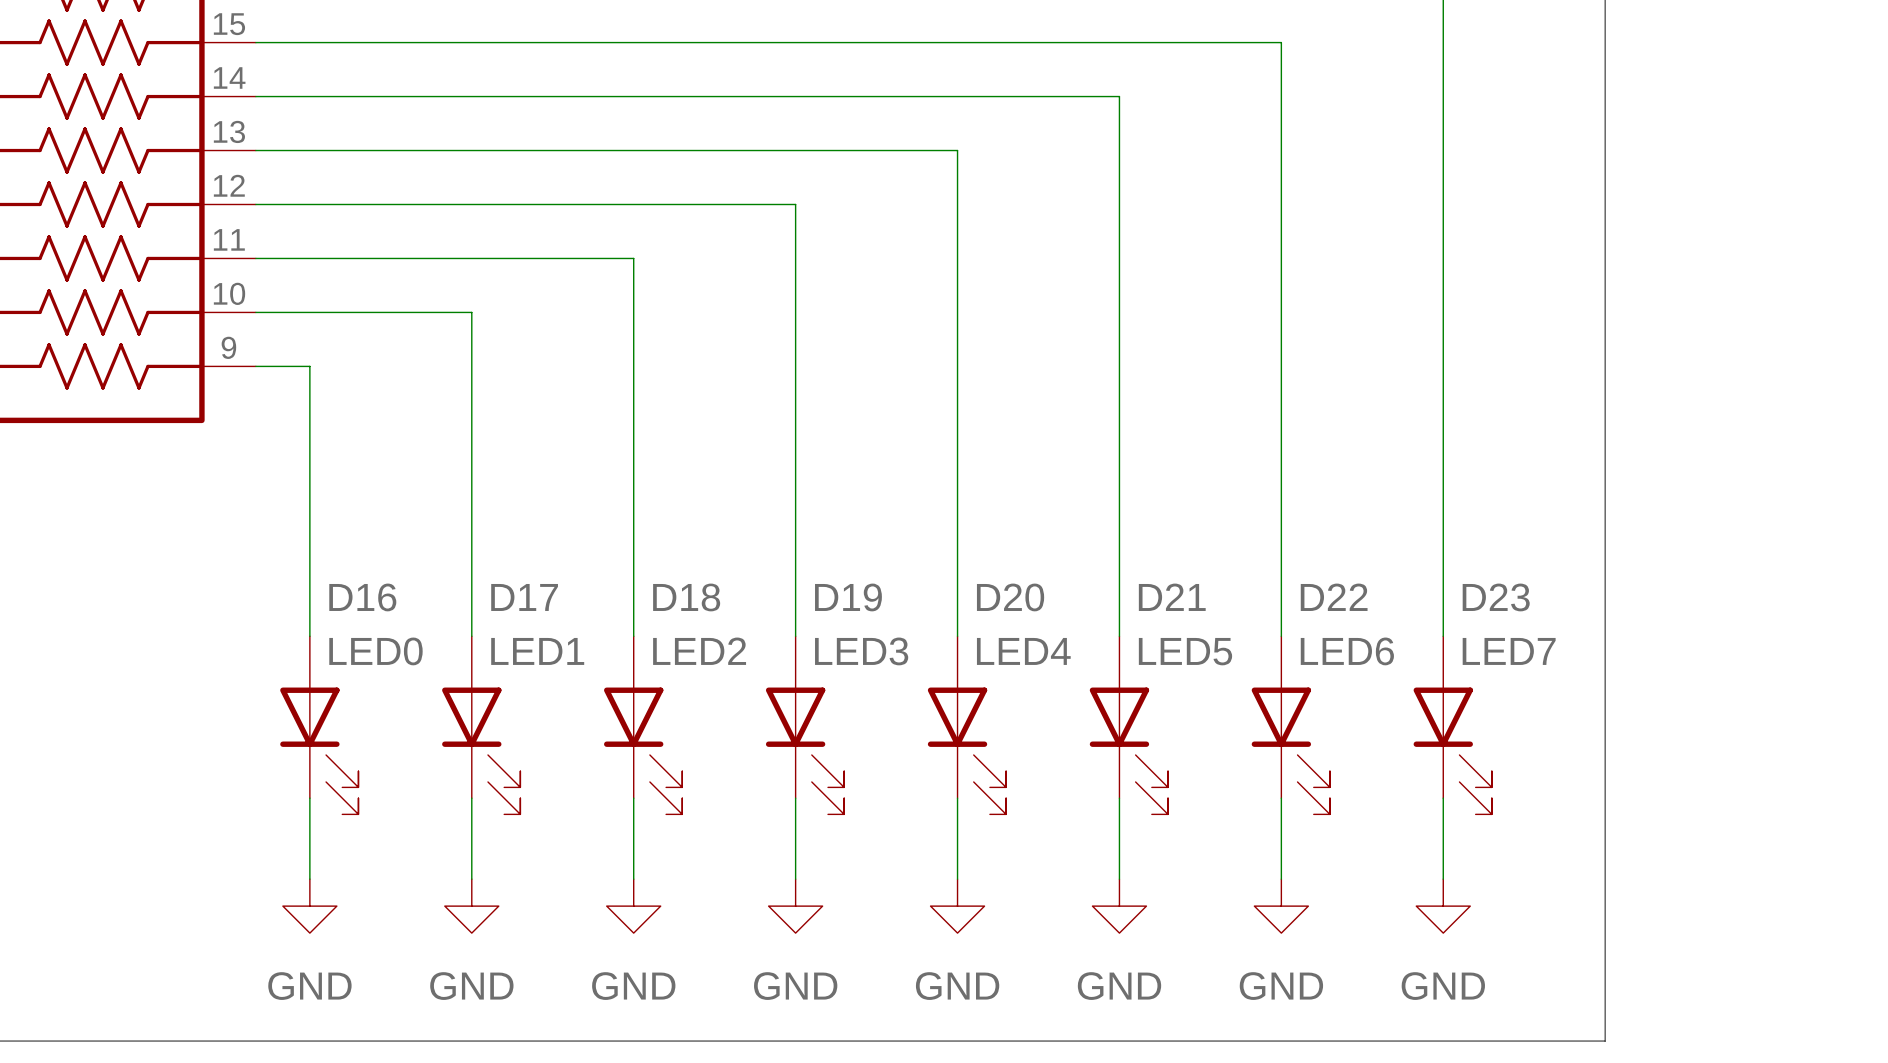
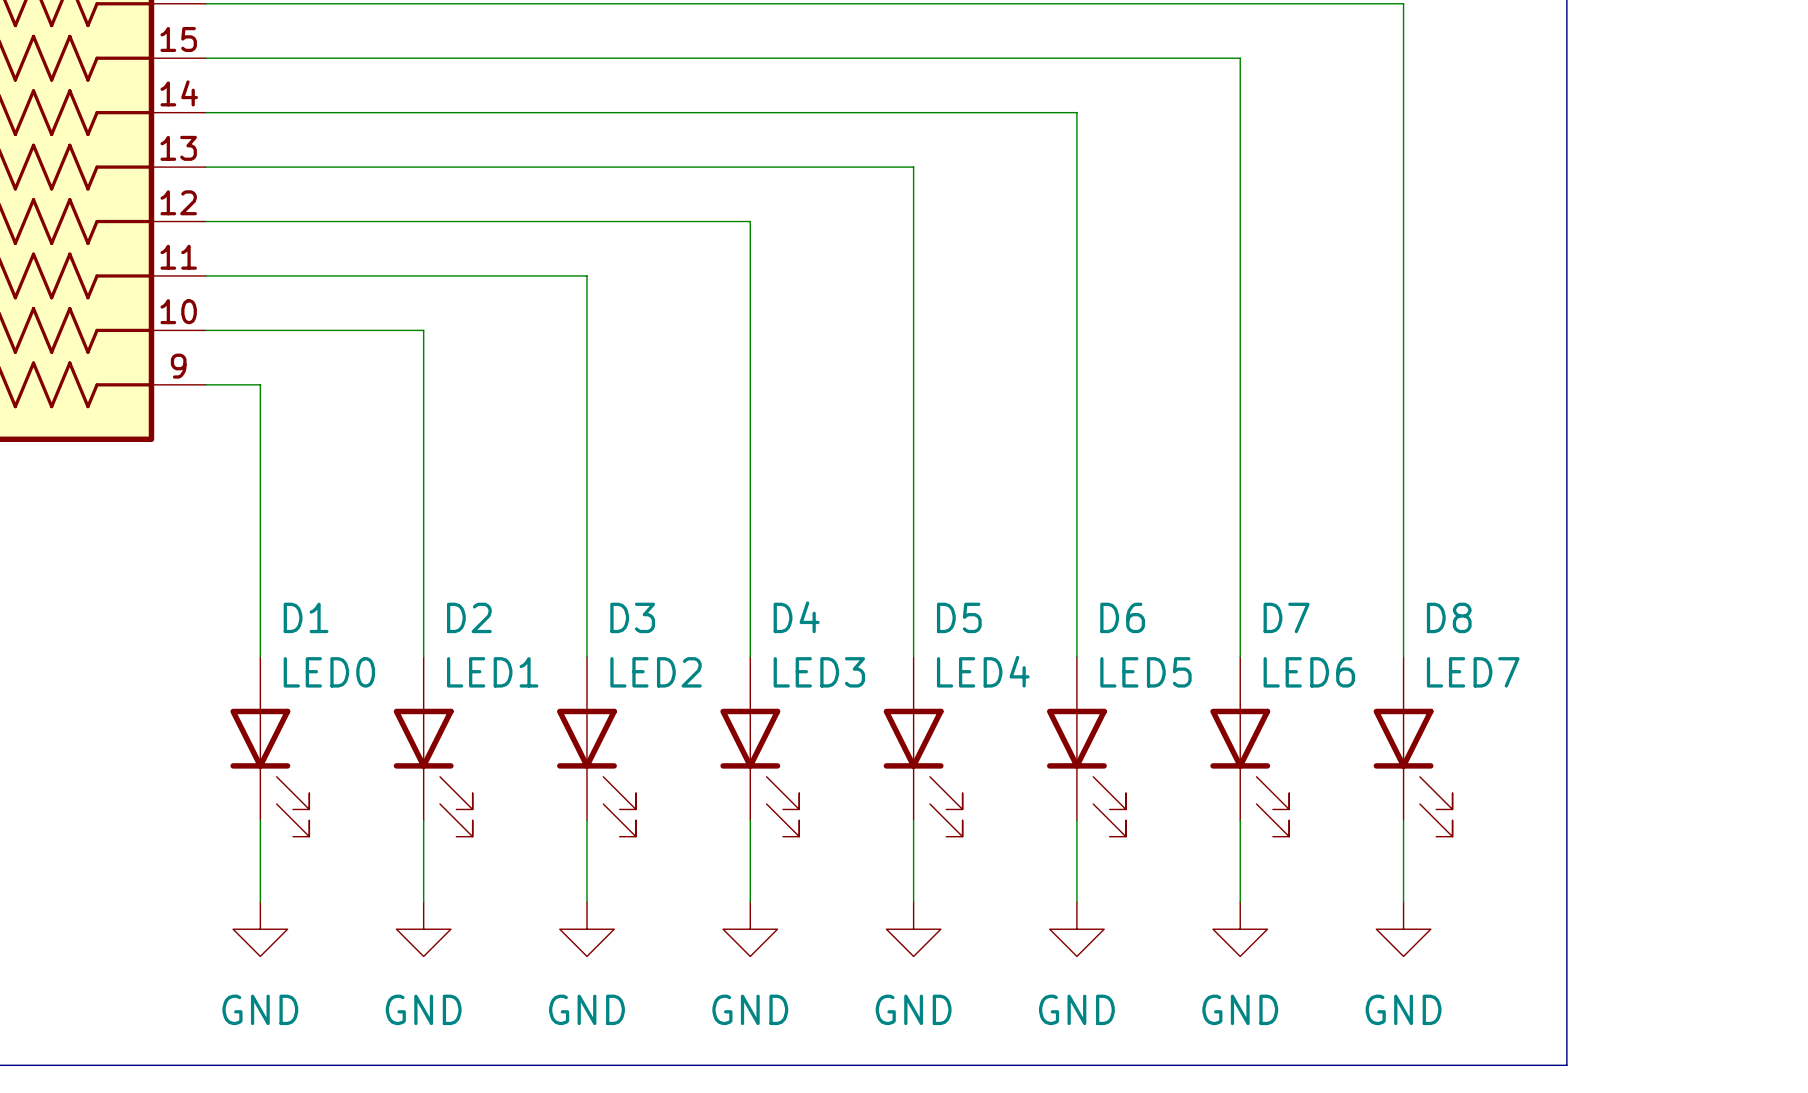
D16 name: D16 (362, 597) -> D1 (306, 617)
D17 name: D17 (524, 597) -> D2 (469, 617)
D18 name: D18 (686, 597) -> D3 (632, 617)
D19 name: D19 (848, 597) -> D4 (796, 617)
D20 name: D20 (1010, 597) -> D5 (959, 617)
D21 name: D21 (1172, 597) -> D6 (1122, 617)
D22 name: D22 (1334, 597) -> D7 (1286, 617)
D23 name: D23 (1496, 597) -> D8 (1449, 617)

